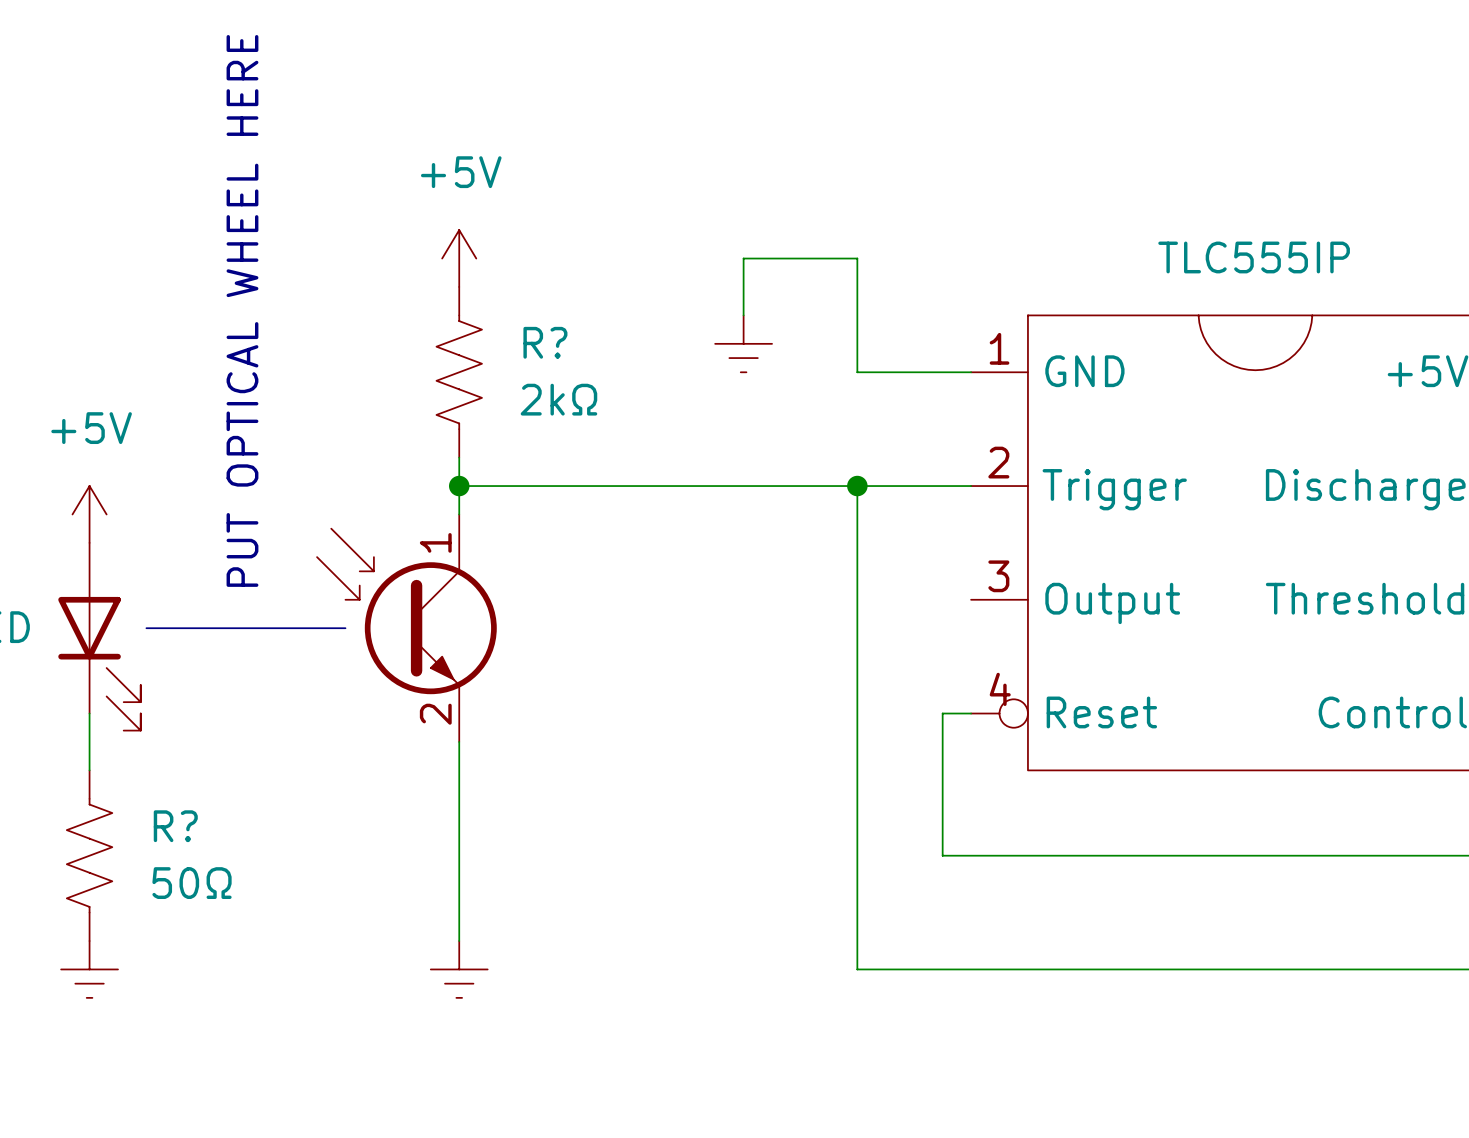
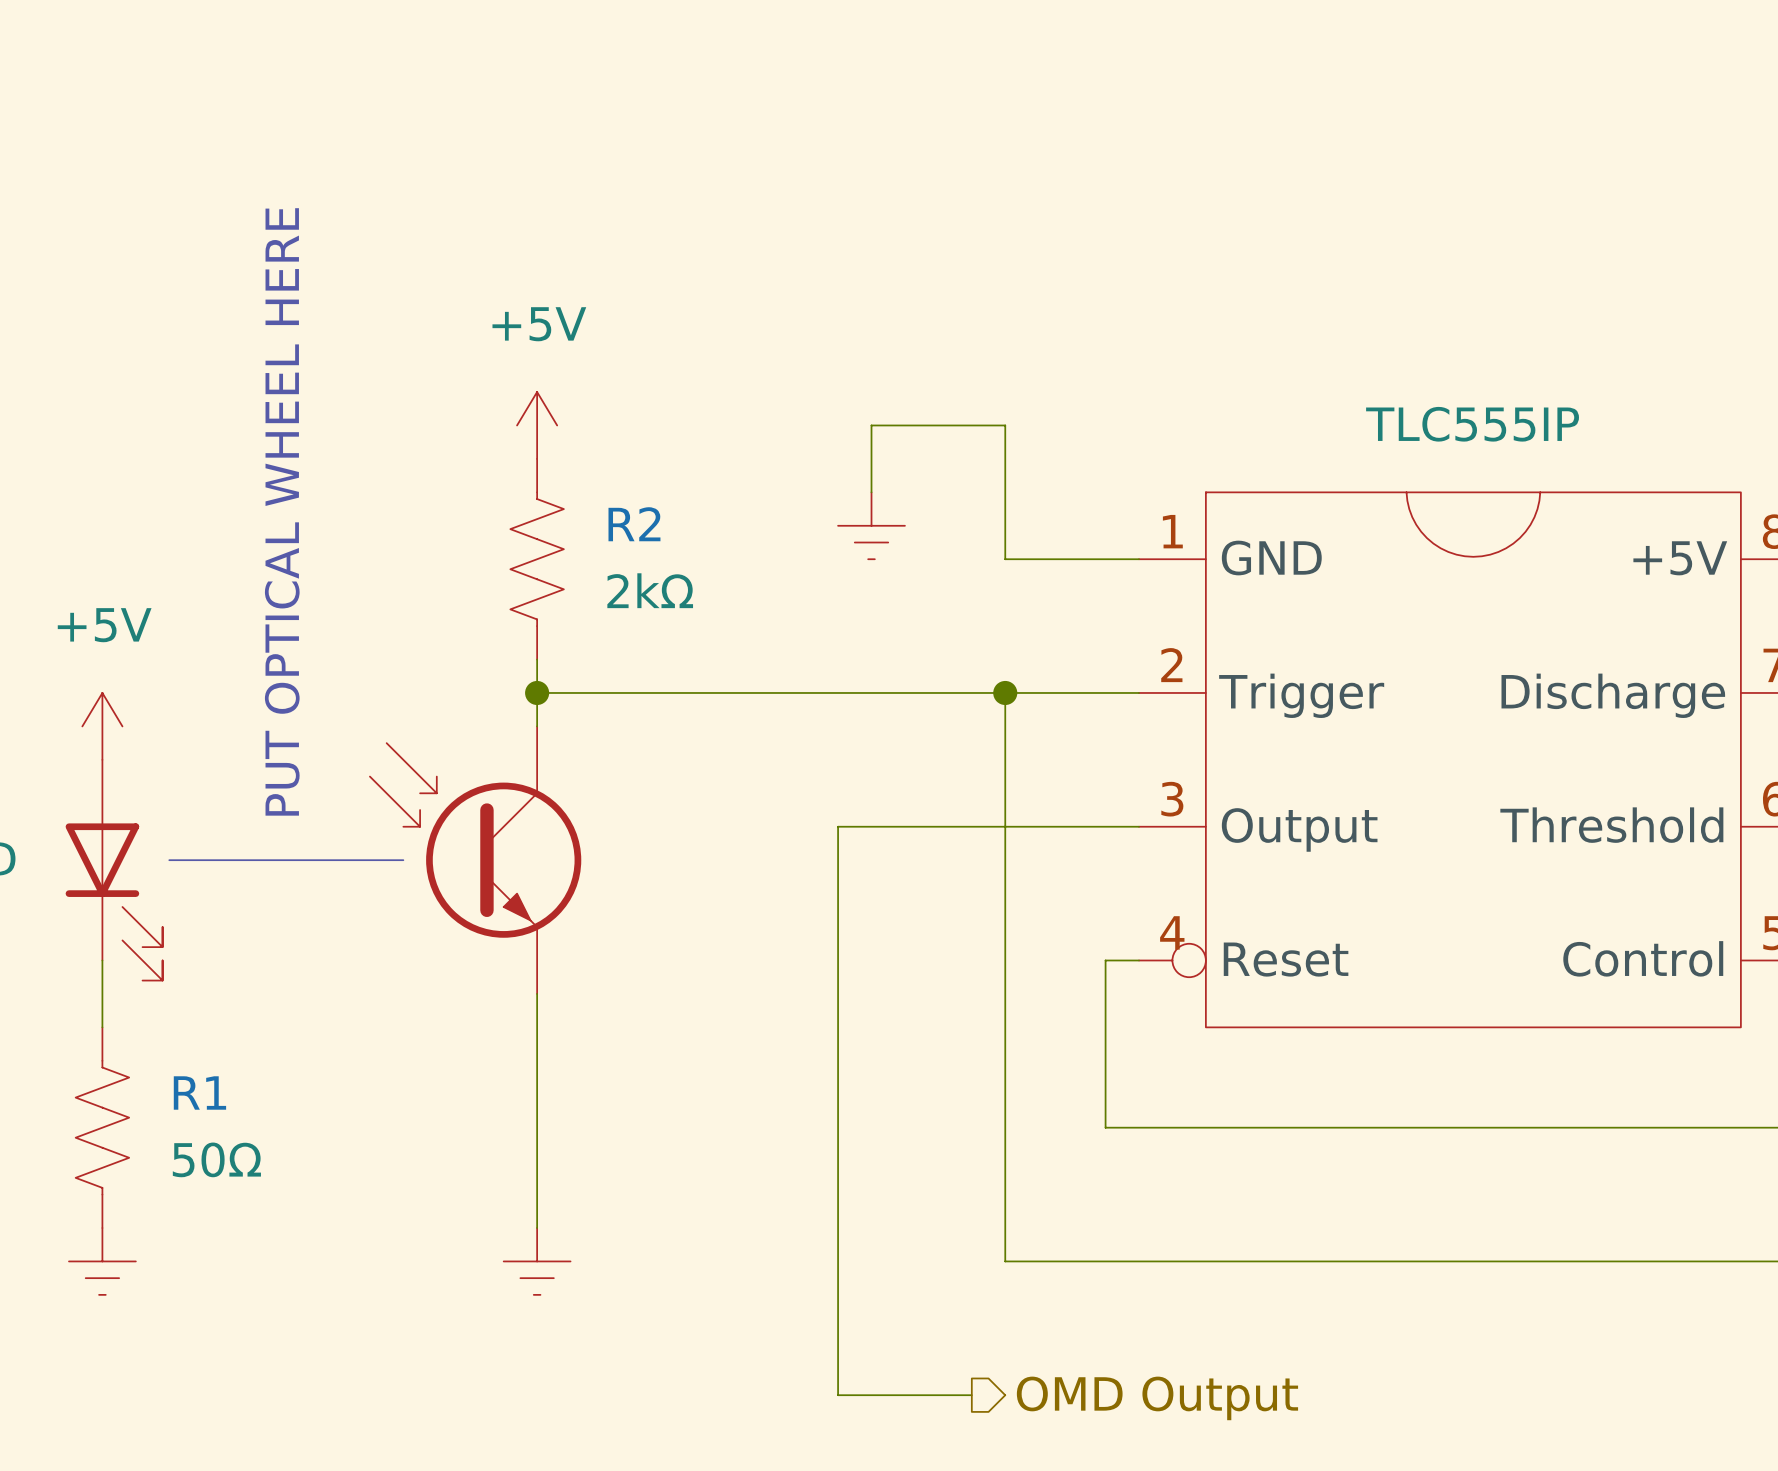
R? name: R? (545, 342) -> R2 (634, 524)
part pin number: 1 (435, 542) -> none
wire: none -> (1139, 826) (838, 826) (838, 1395) (971, 1395)
part pin number: 2 (435, 714) -> none
R? name: R? (175, 826) -> R1 (199, 1092)
hierarchical label: none -> OMD Output (1157, 1398)

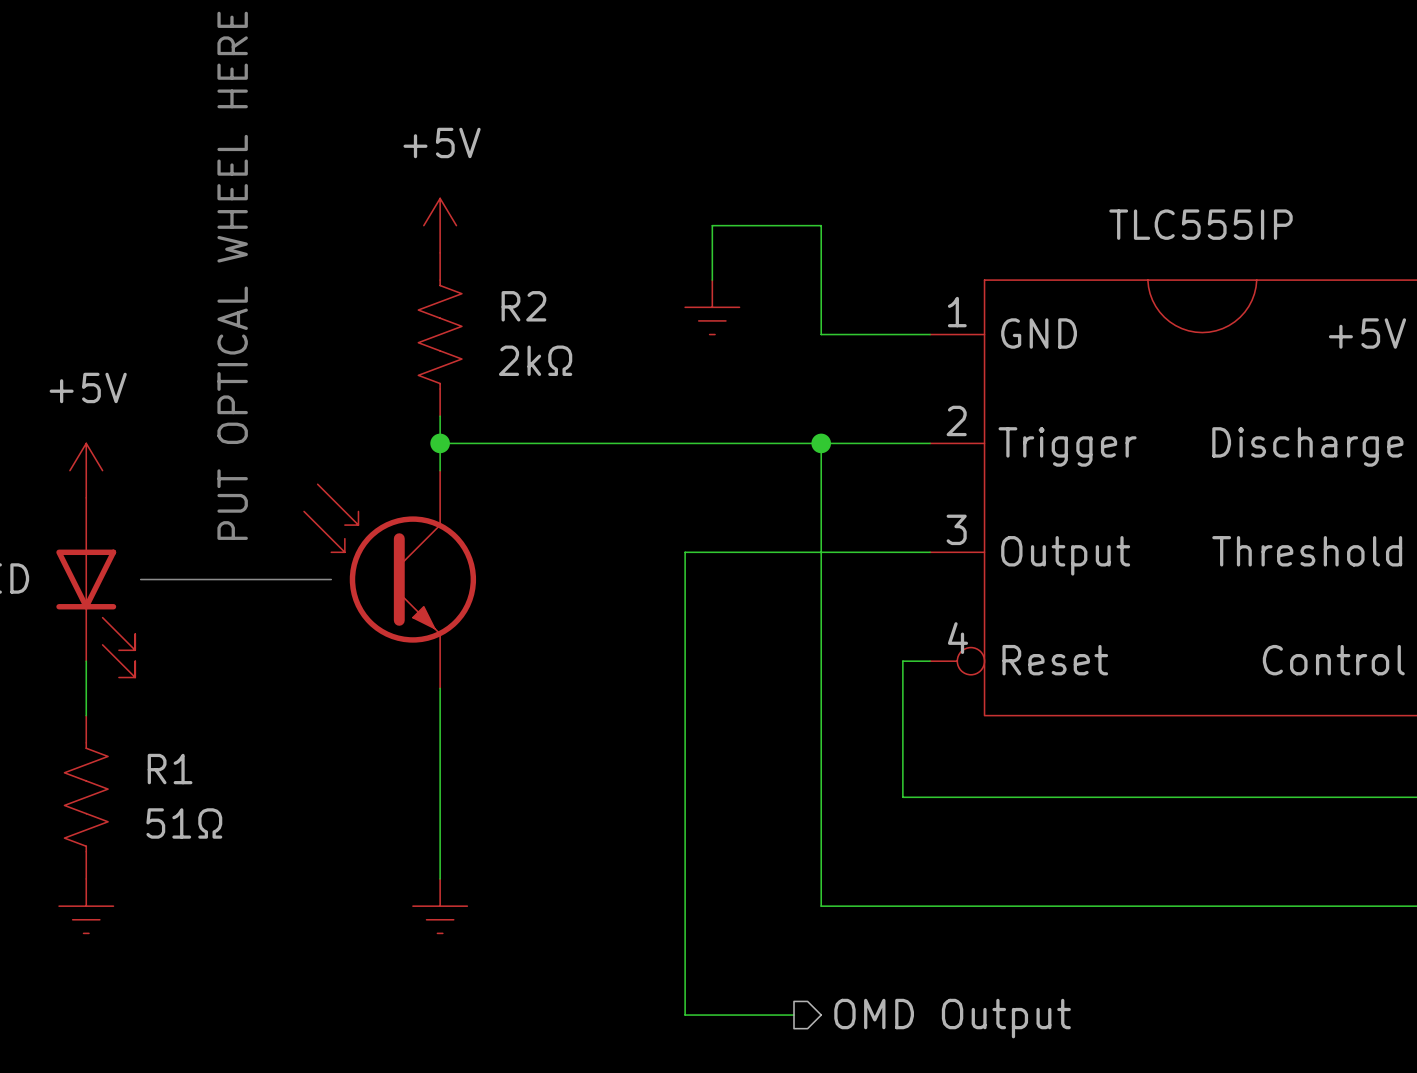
R1 value: 50Ω (216, 1159) -> 51Ω (184, 823)

